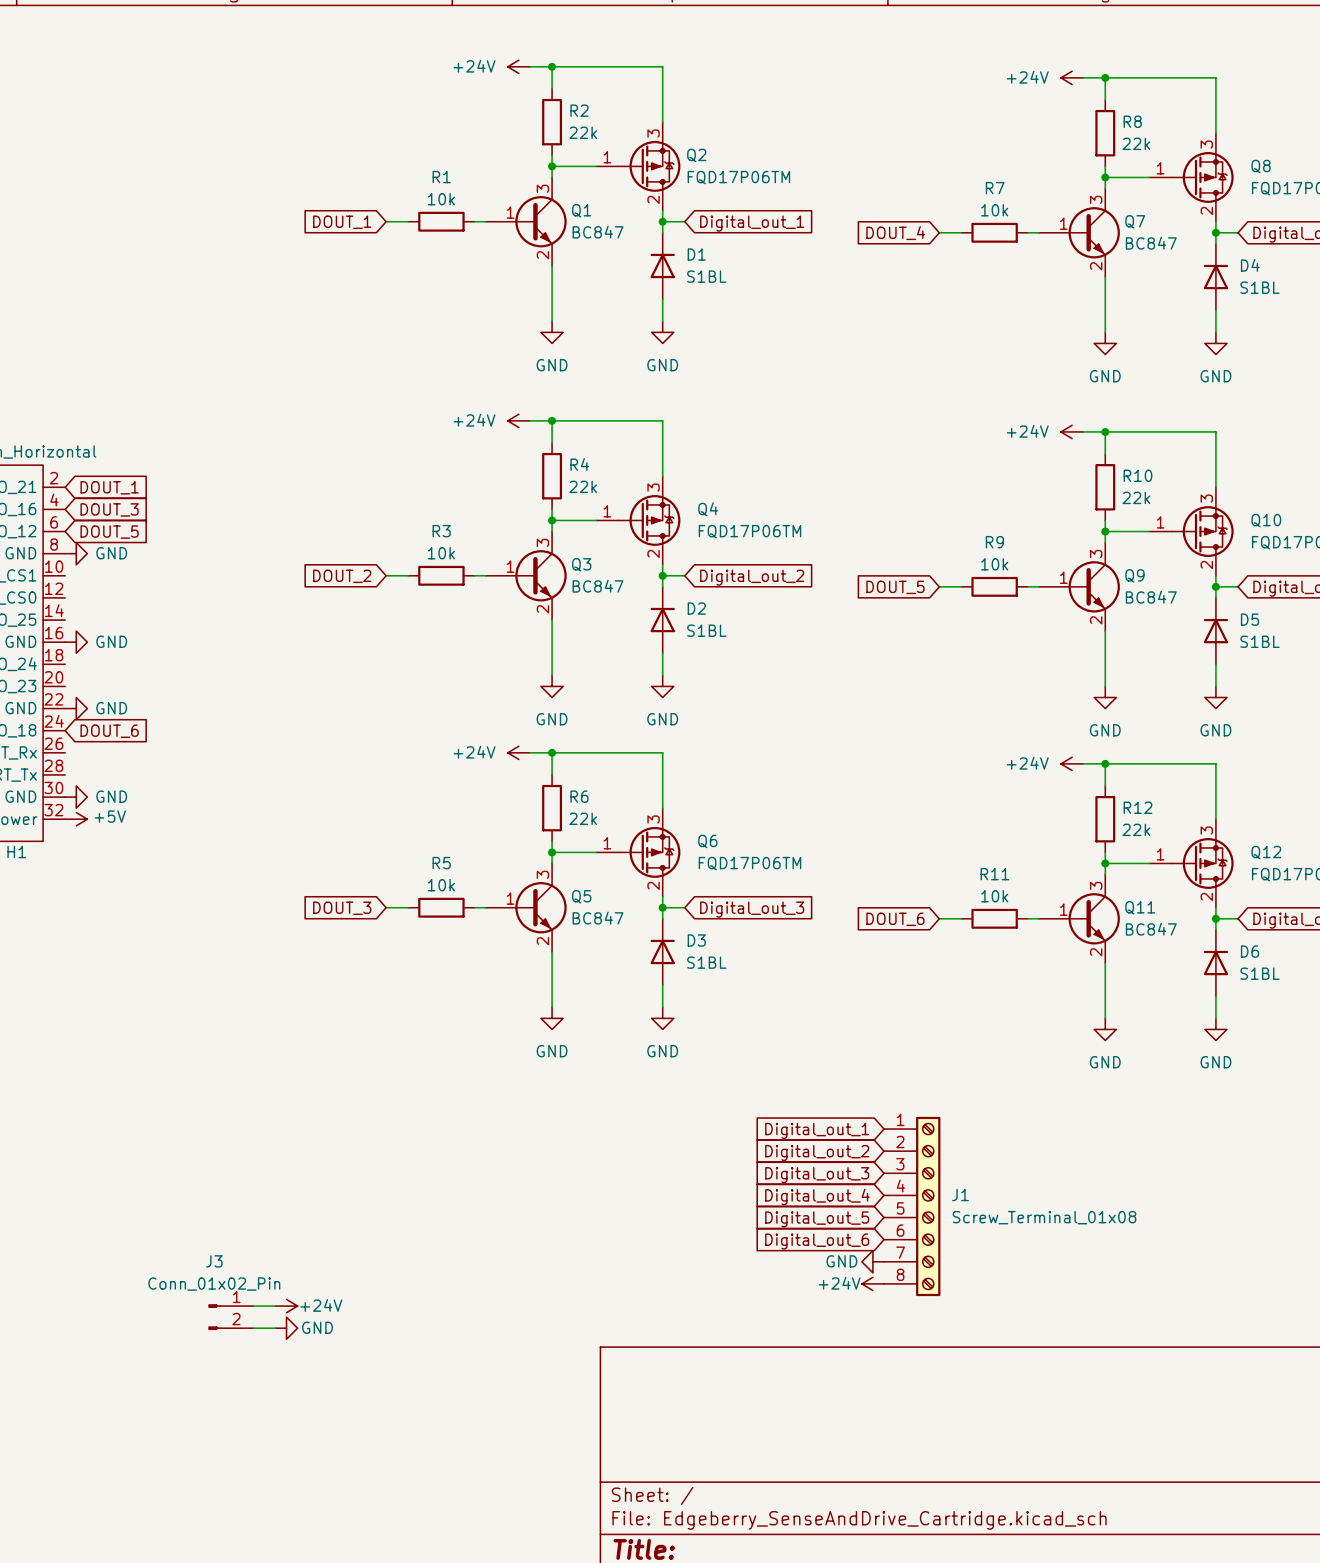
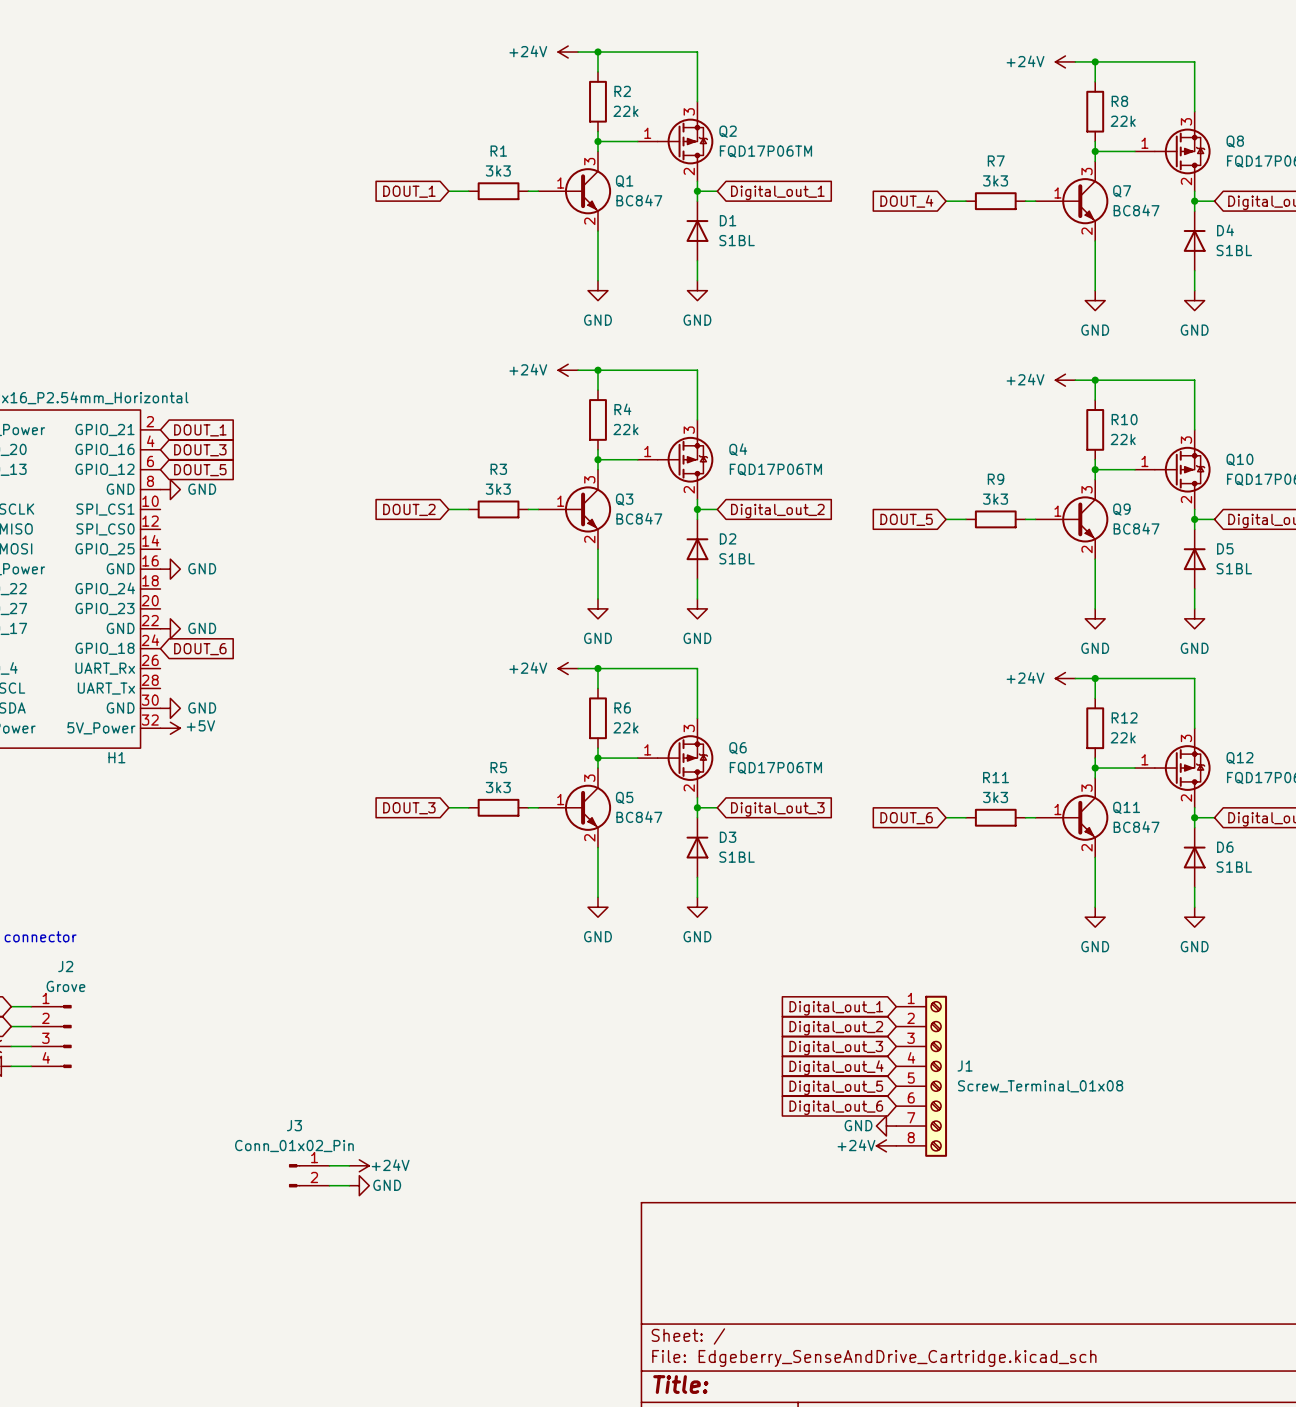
R1 value: 10k (441, 199) -> 3k3 (498, 170)
R7 value: 10k (994, 210) -> 3k3 (995, 180)
R3 value: 10k (441, 553) -> 3k3 (498, 489)
R9 value: 10k (994, 564) -> 3k3 (995, 499)
R5 value: 10k (441, 885) -> 3k3 (498, 787)
R11 value: 10k (994, 896) -> 3k3 (995, 797)

